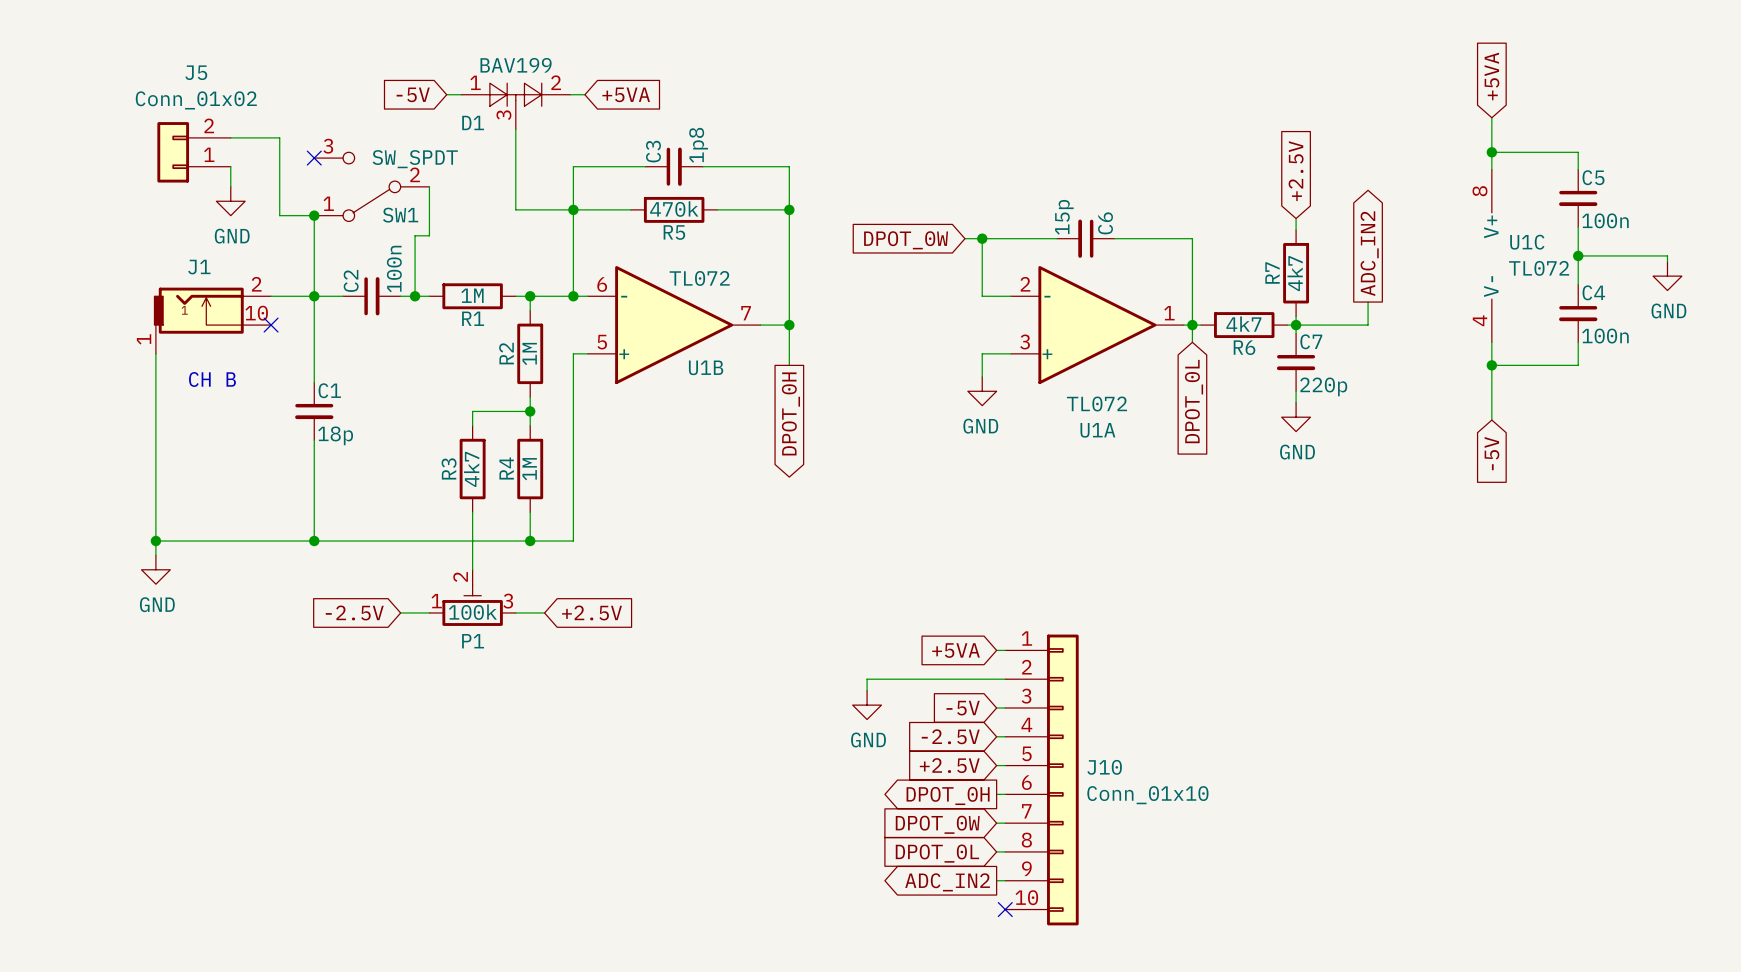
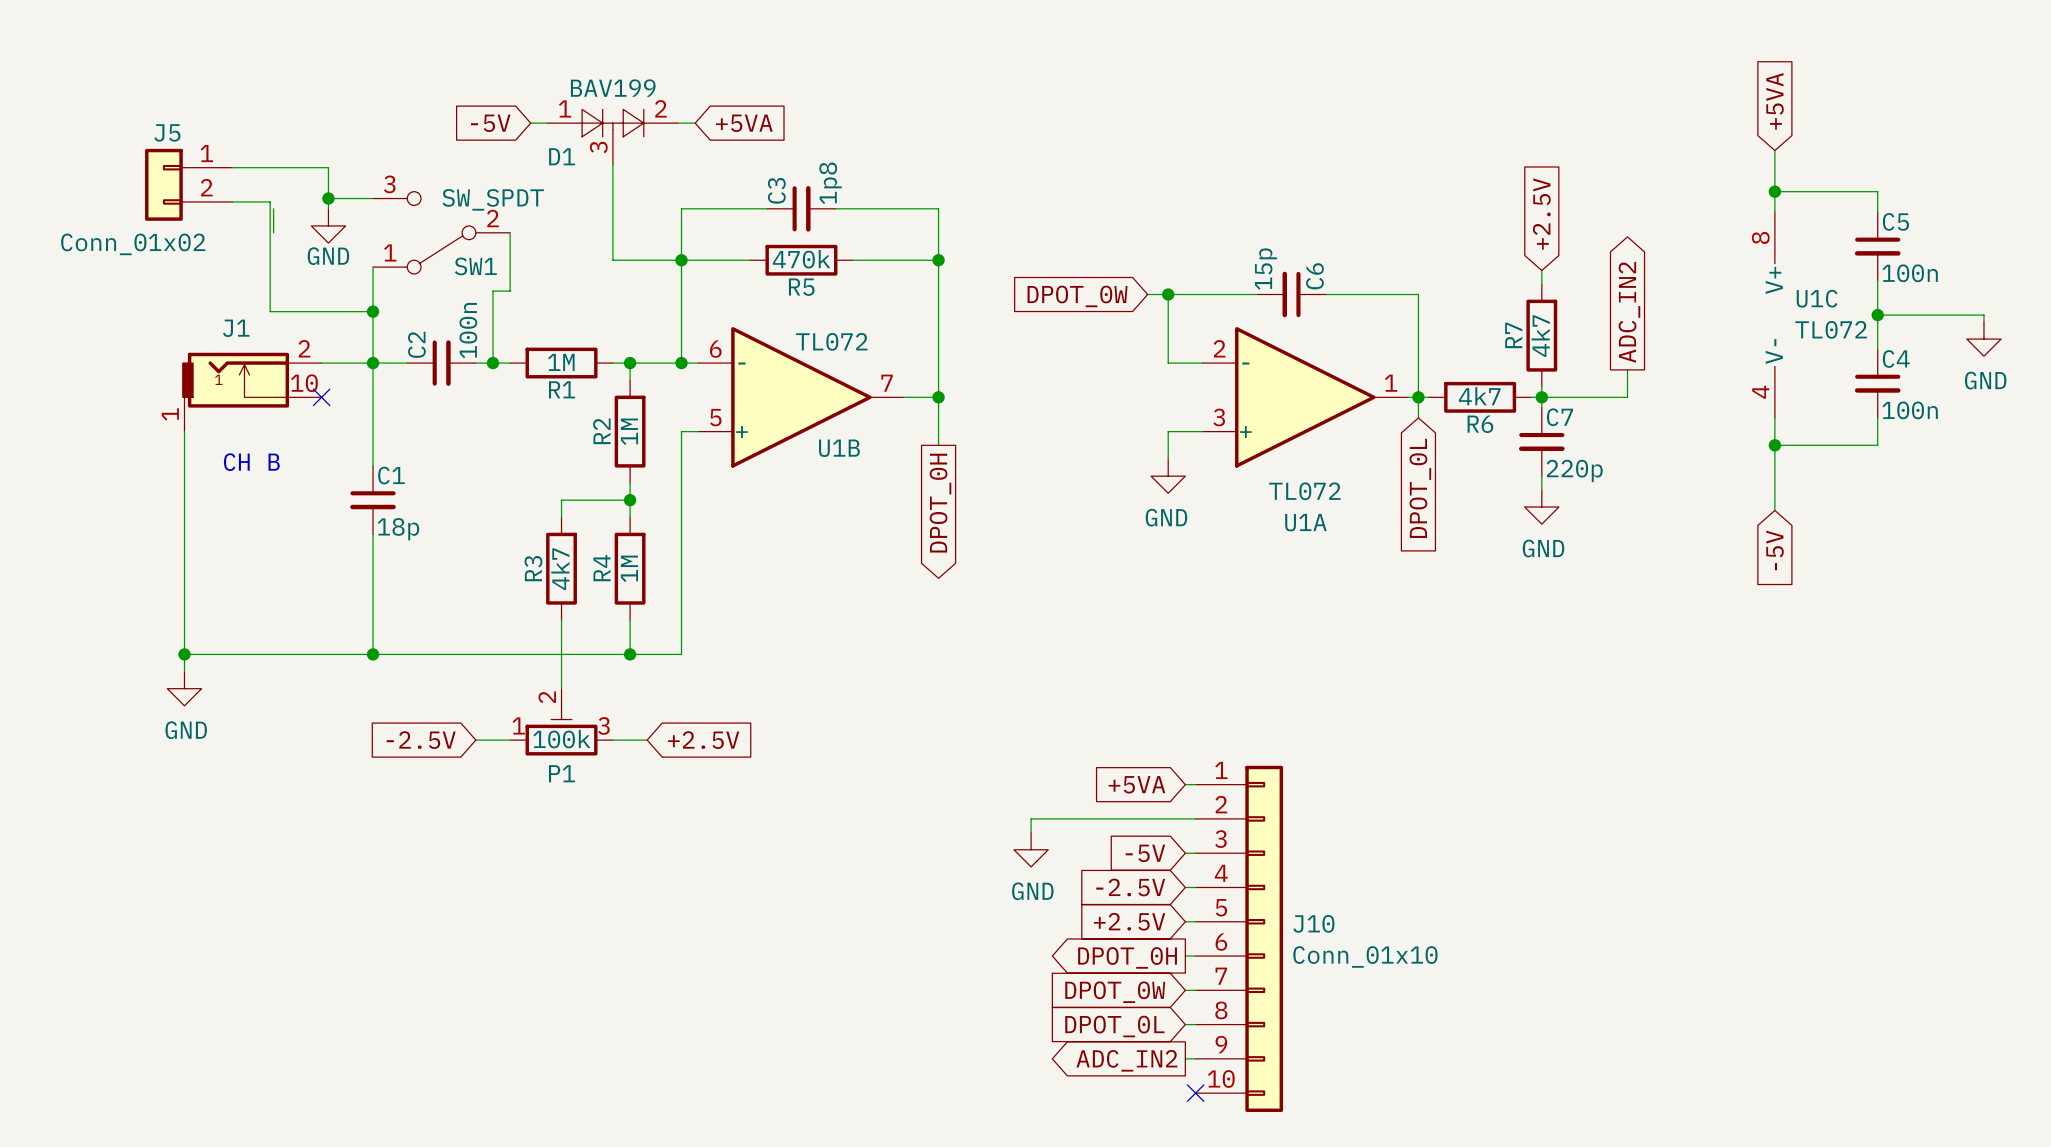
J5 name position: J5 (196, 72) -> J5 (167, 132)
J5 value position: Conn_01x02 (196, 100) -> Conn_01x02 (133, 244)
wire: none -> (232, 167) (328, 167) (328, 208)
wire: (230, 137) (279, 137) (279, 215) (314, 215) -> none
J5 flip: as is (173, 152) -> up-down (163, 184)
wire: none -> (328, 198) (373, 198)
junction: none -> (328, 198)
no-connect mark: (314, 158) -> none
wire: none -> (232, 201) (270, 201) (270, 311) (373, 311)
power symbol position: GND (230, 201) -> GND (328, 225)
junction: (314, 215) -> none
power symbol text position: GND (232, 236) -> GND (328, 256)
junction: none -> (373, 311)

